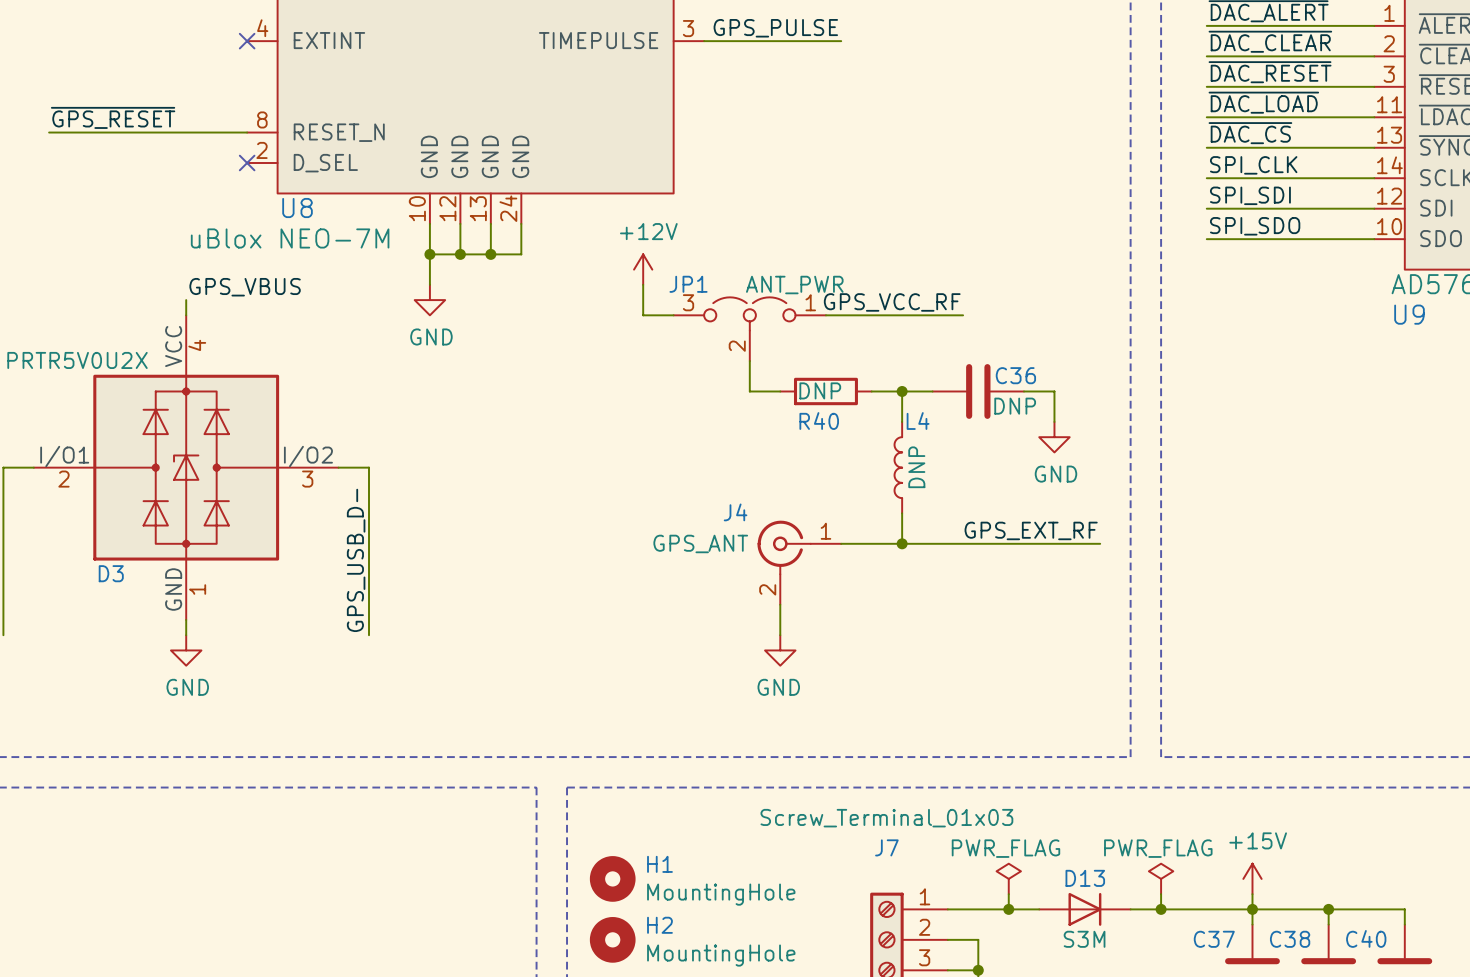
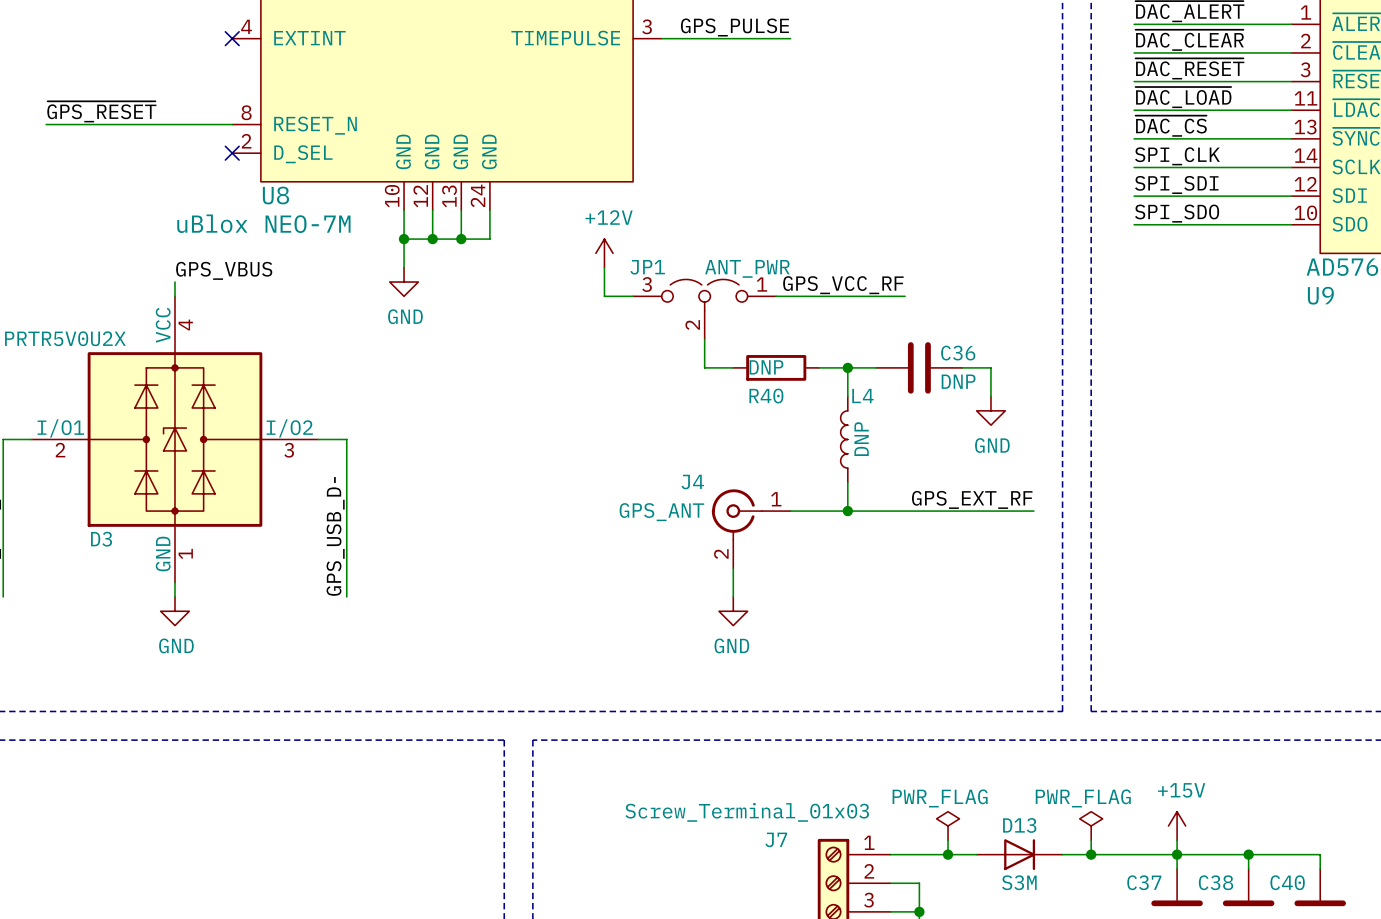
J7 value position: Screw_Terminal_01x03 (886, 818) -> Screw_Terminal_01x03 (747, 812)
J7 name position: J7 (886, 847) -> J7 (776, 839)
H1: MountingHole (612, 878) -> none
H2: MountingHole (612, 939) -> none

